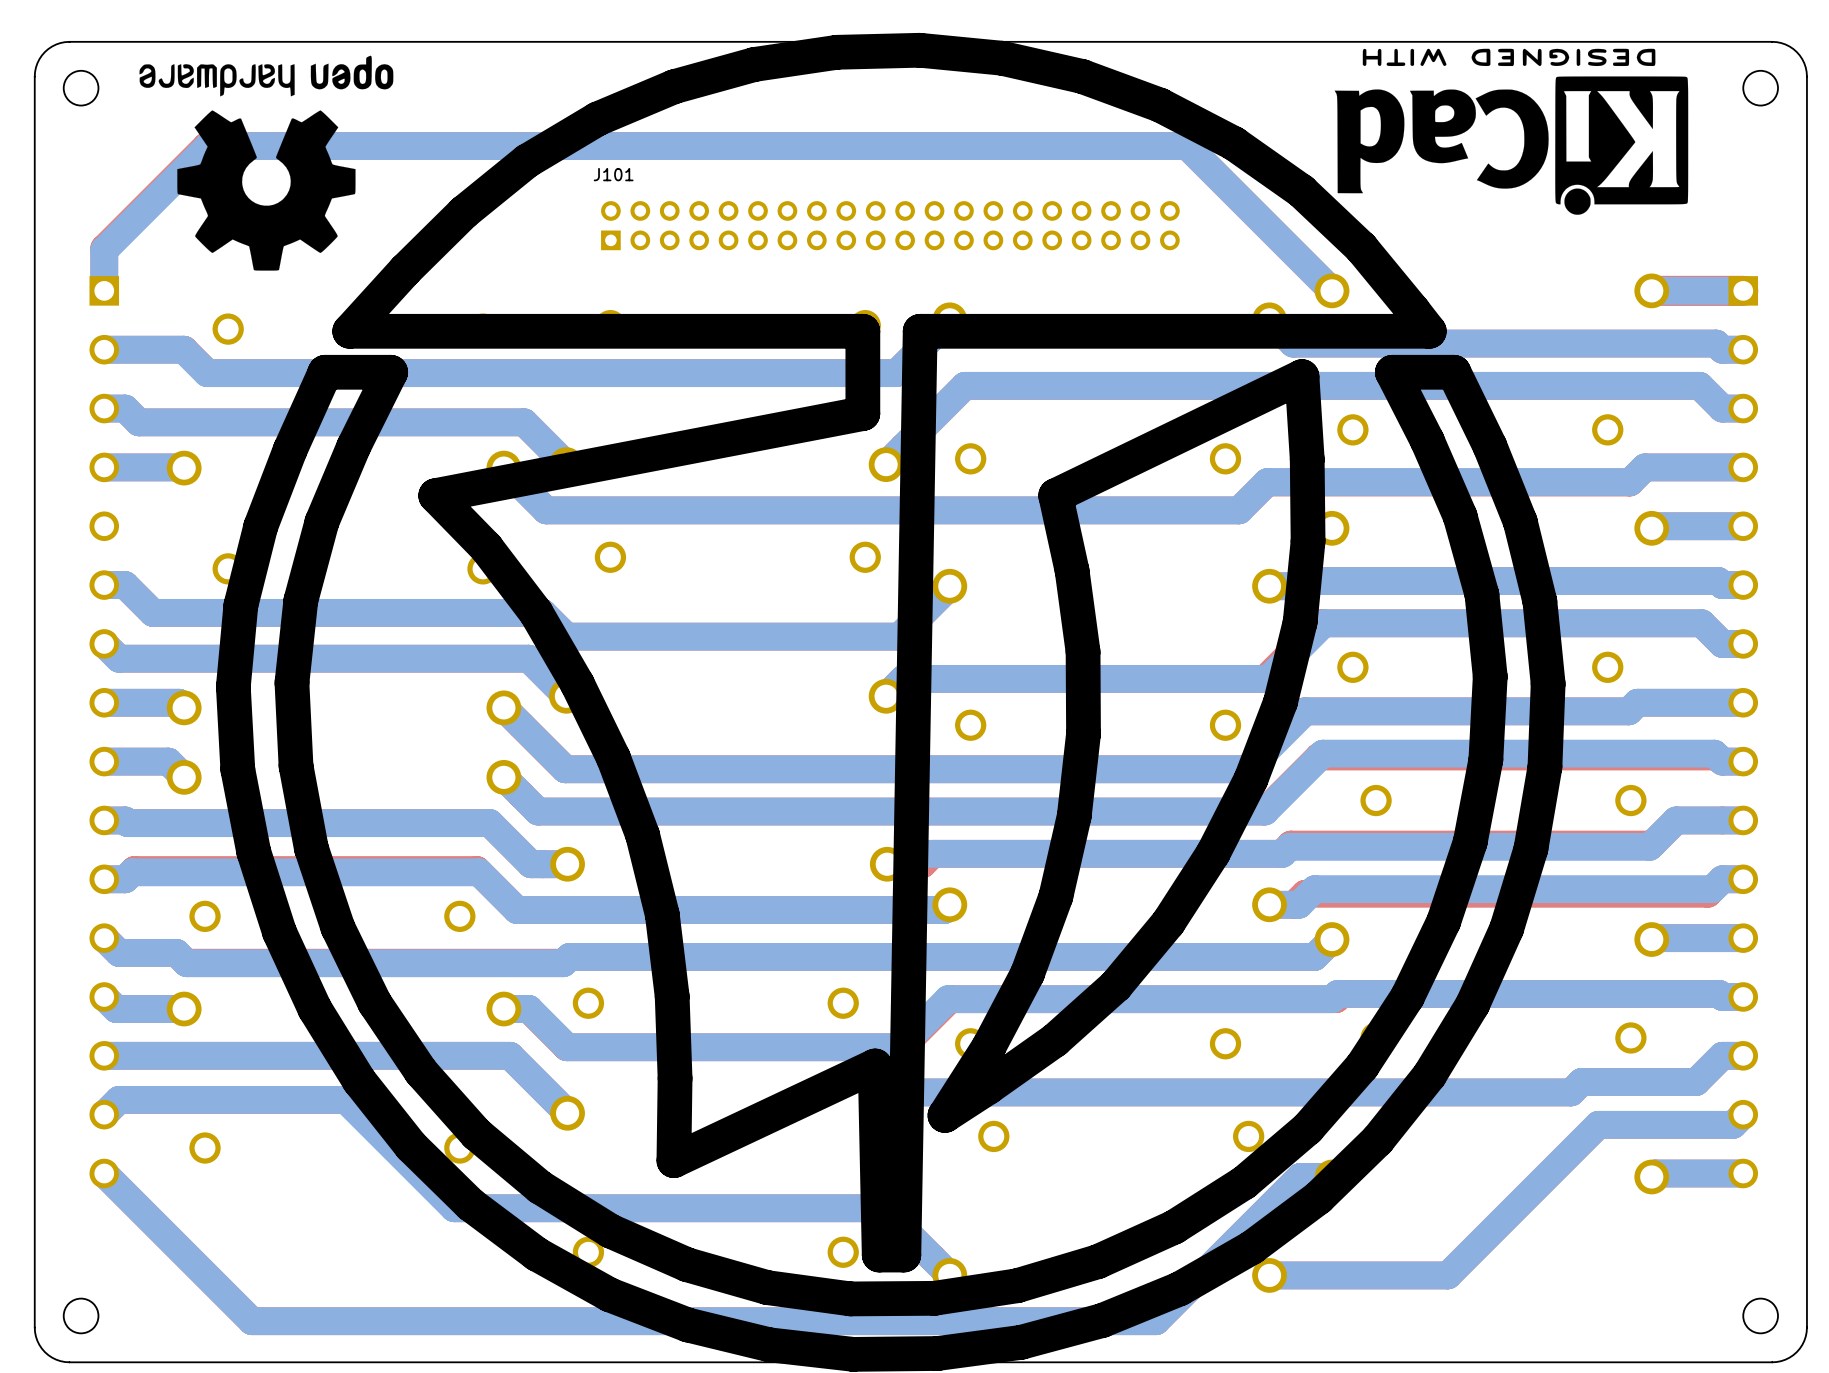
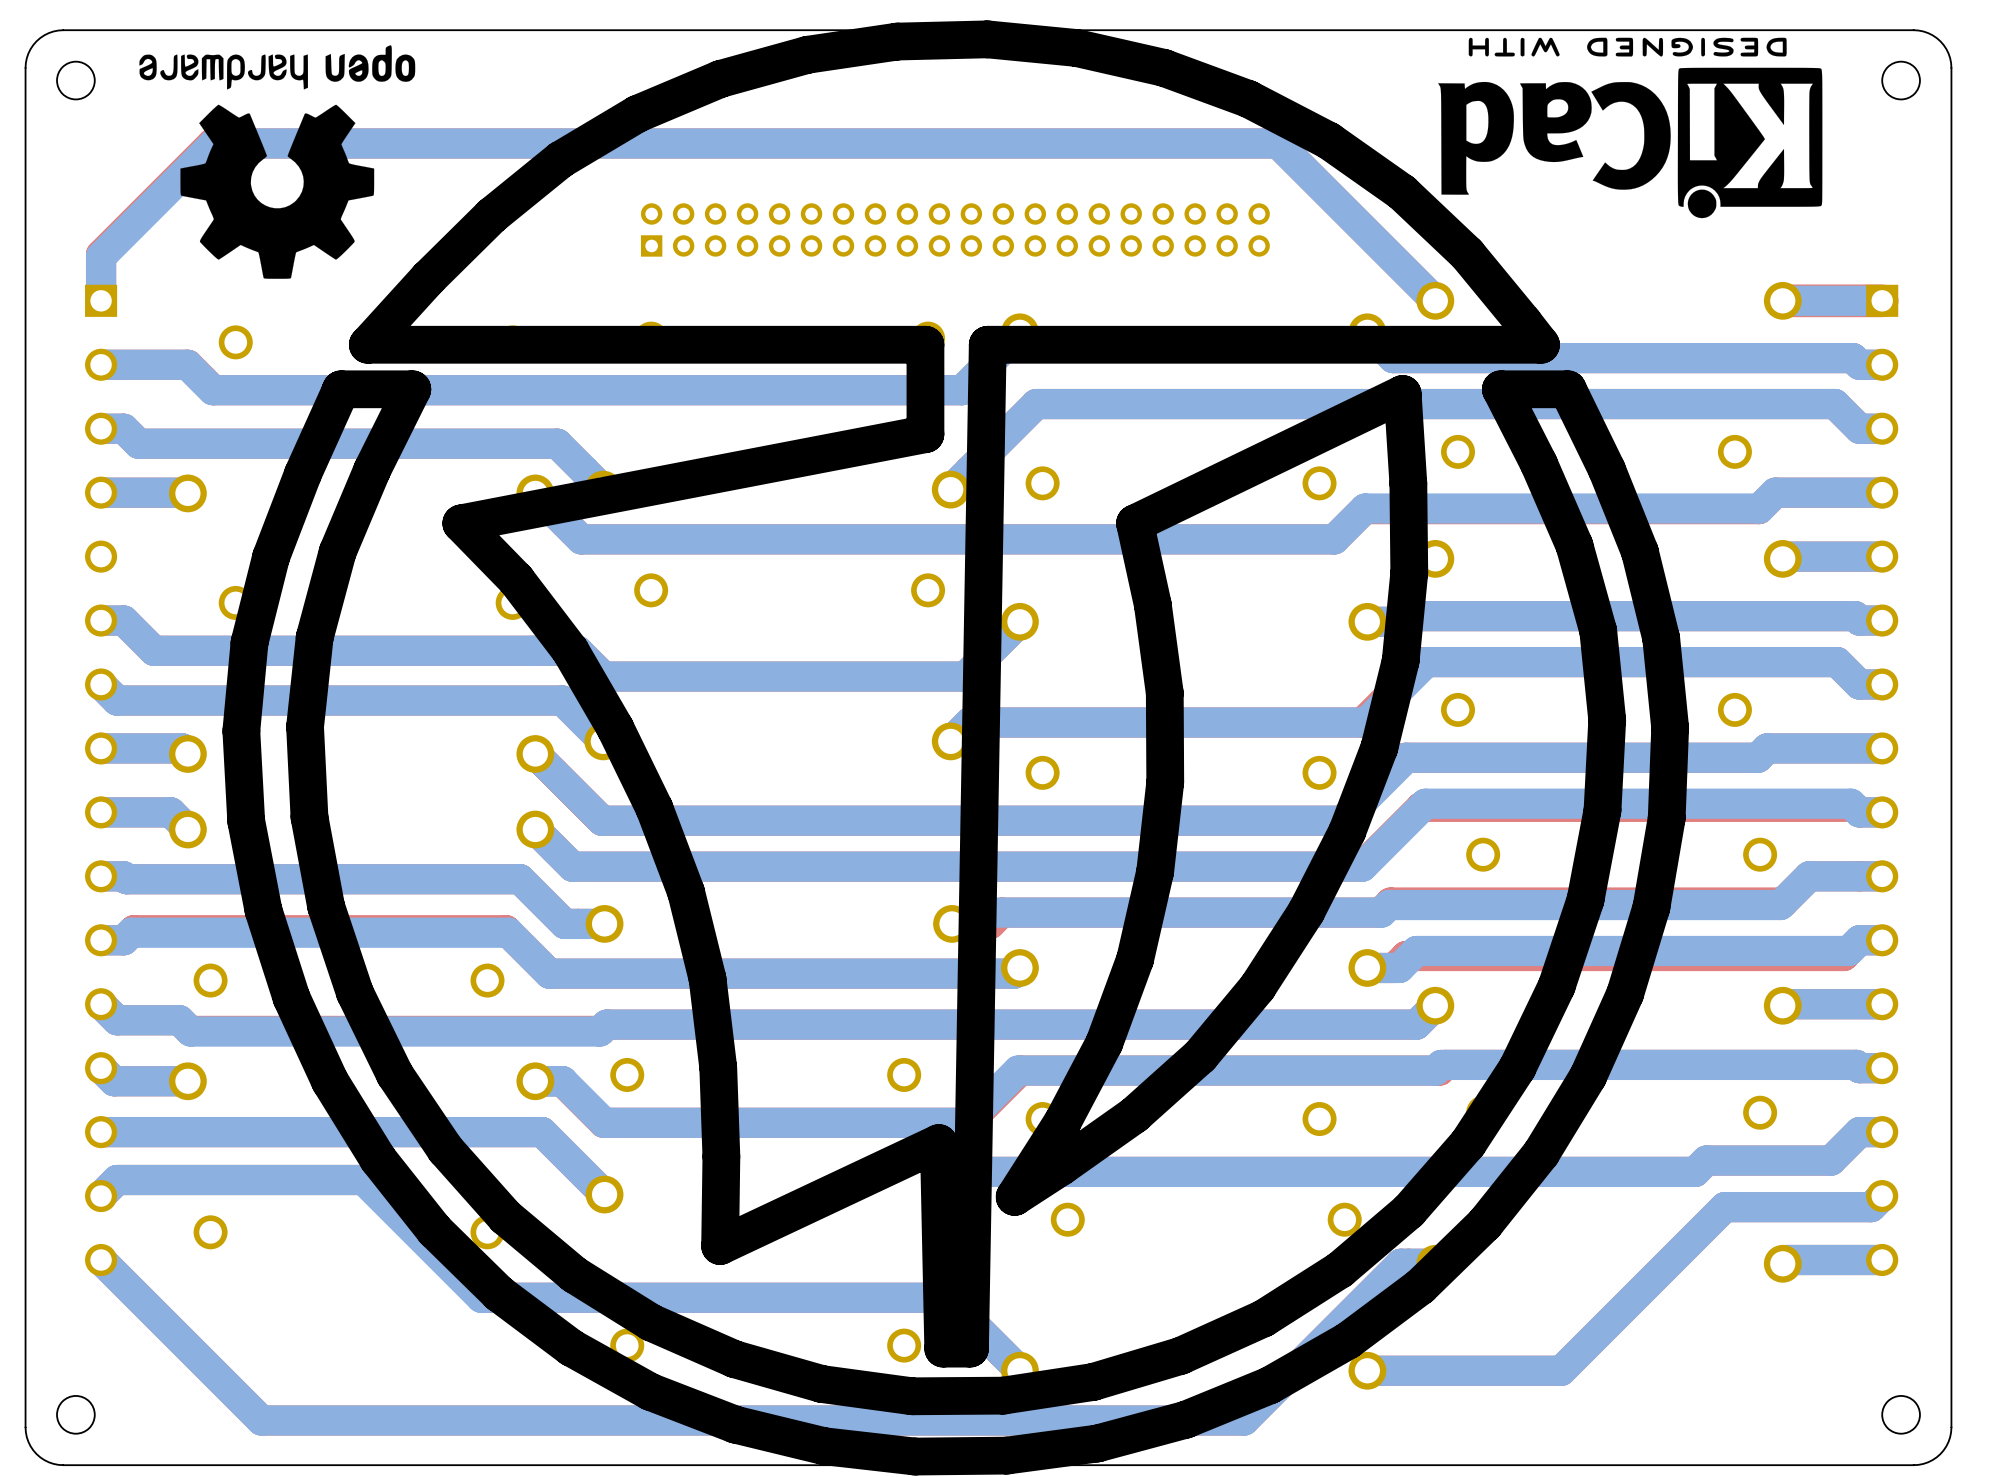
J101 name: J101 (613, 174) -> none

